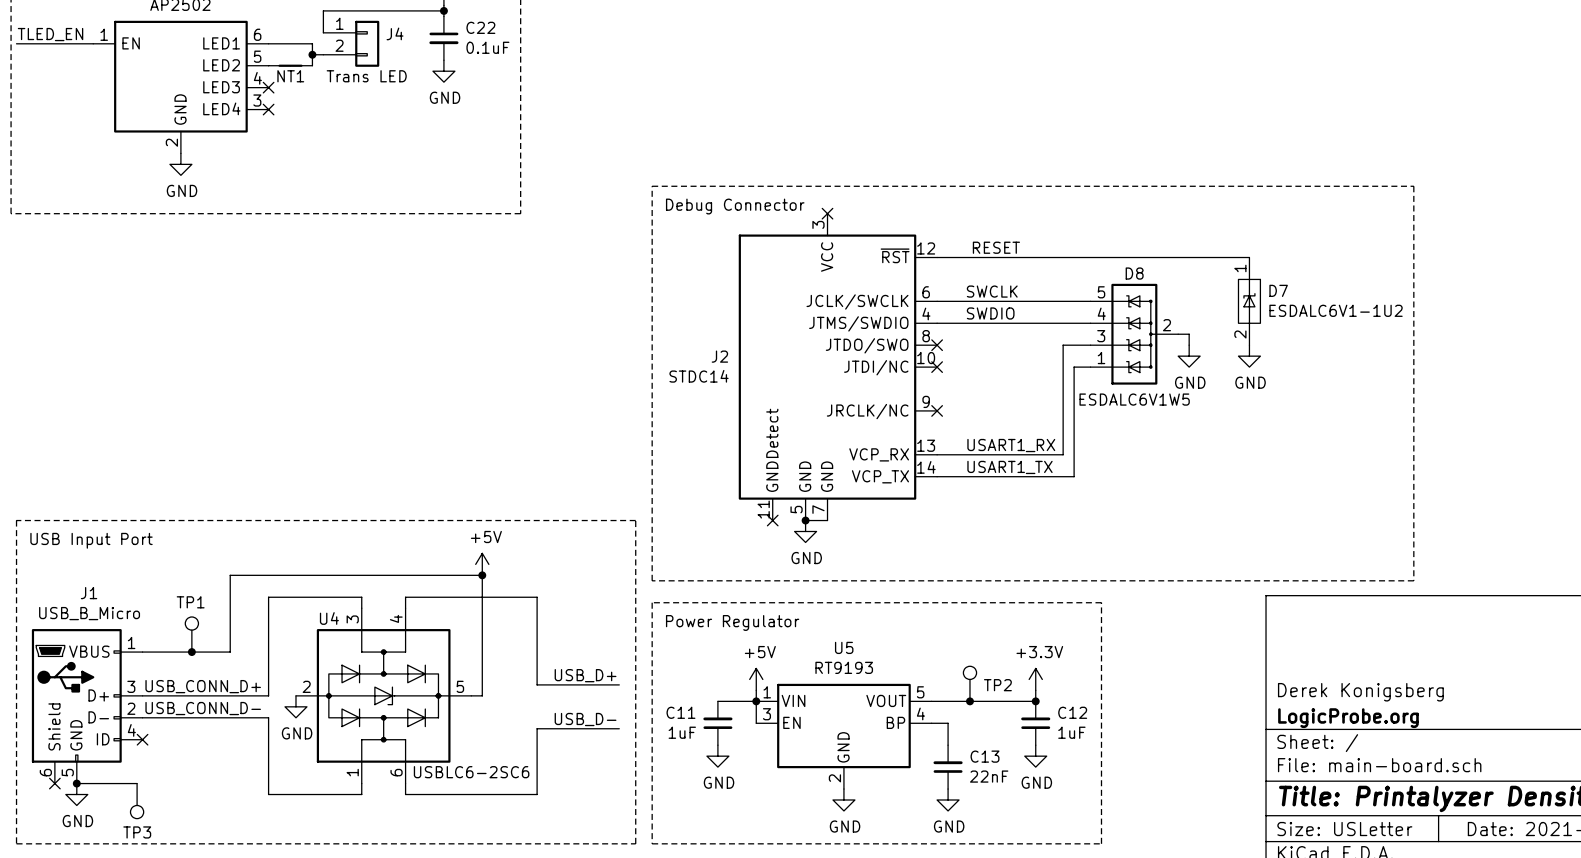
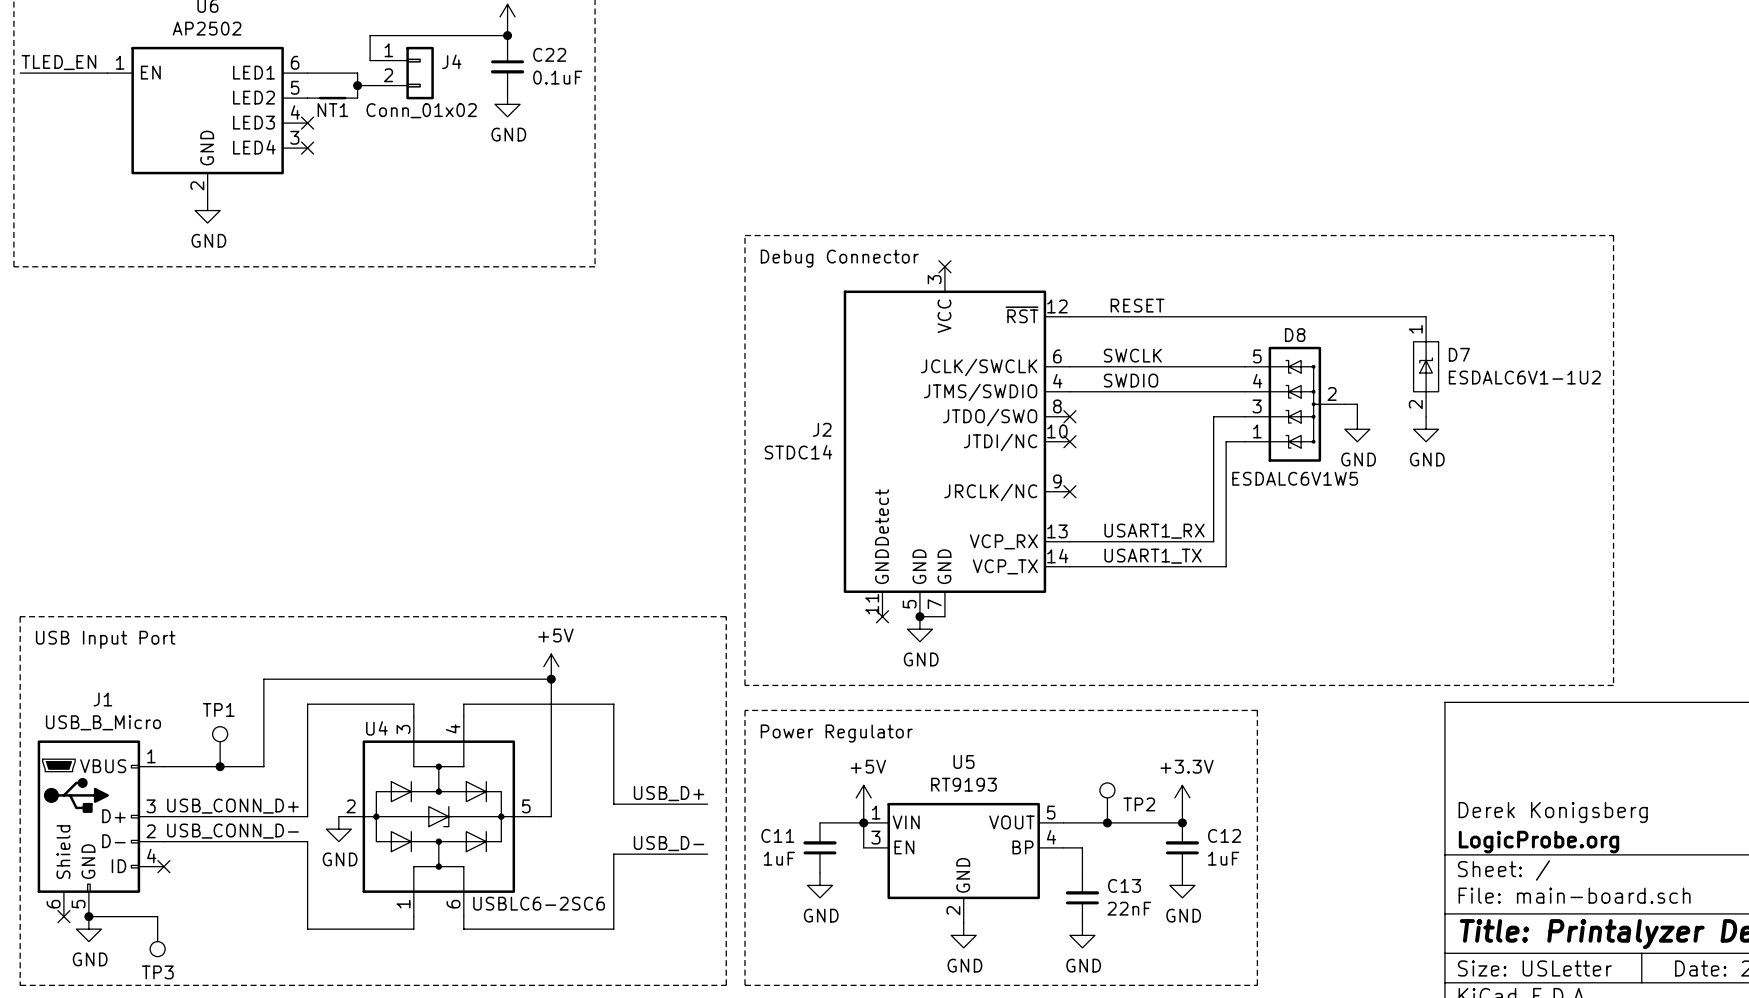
J4 text: Trans LED (366, 76) -> none
J4 value: none -> Conn_01x02 (421, 110)

